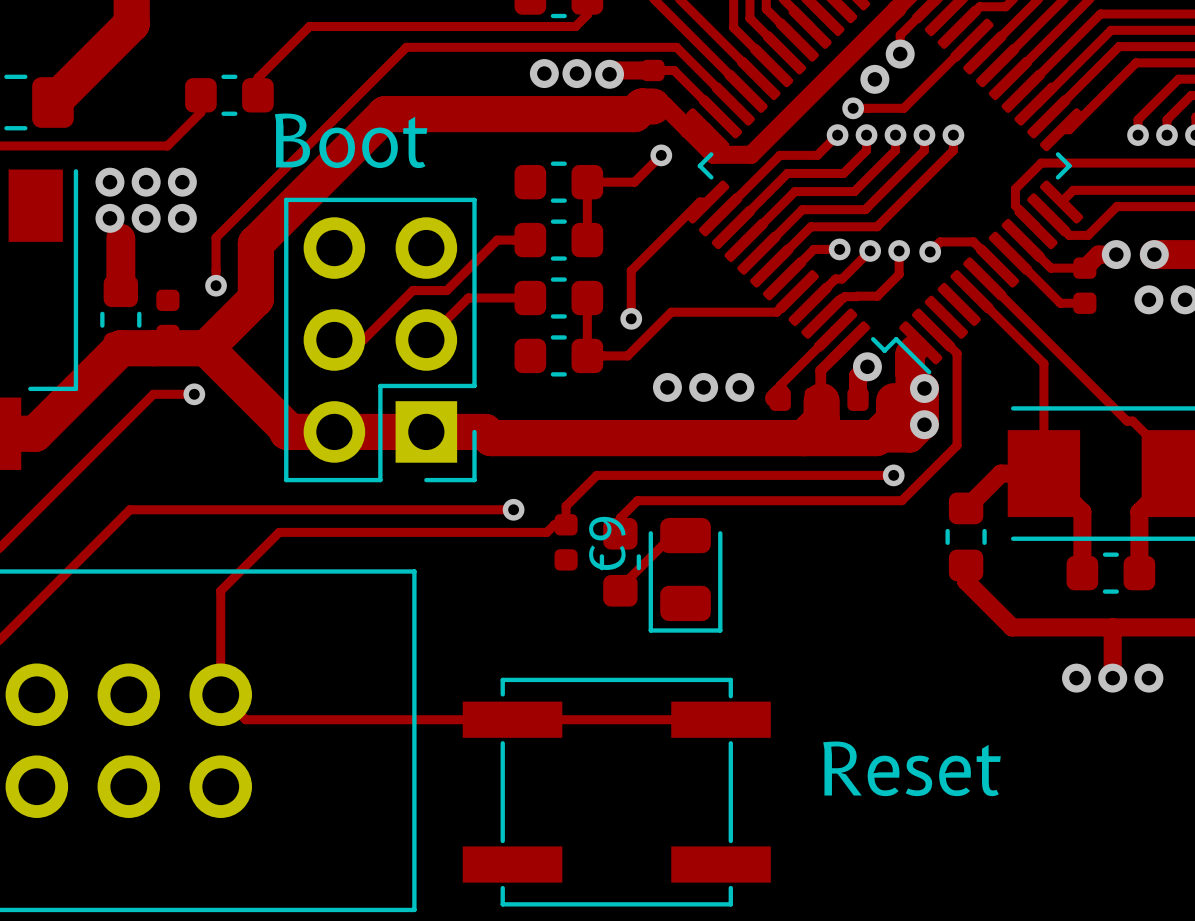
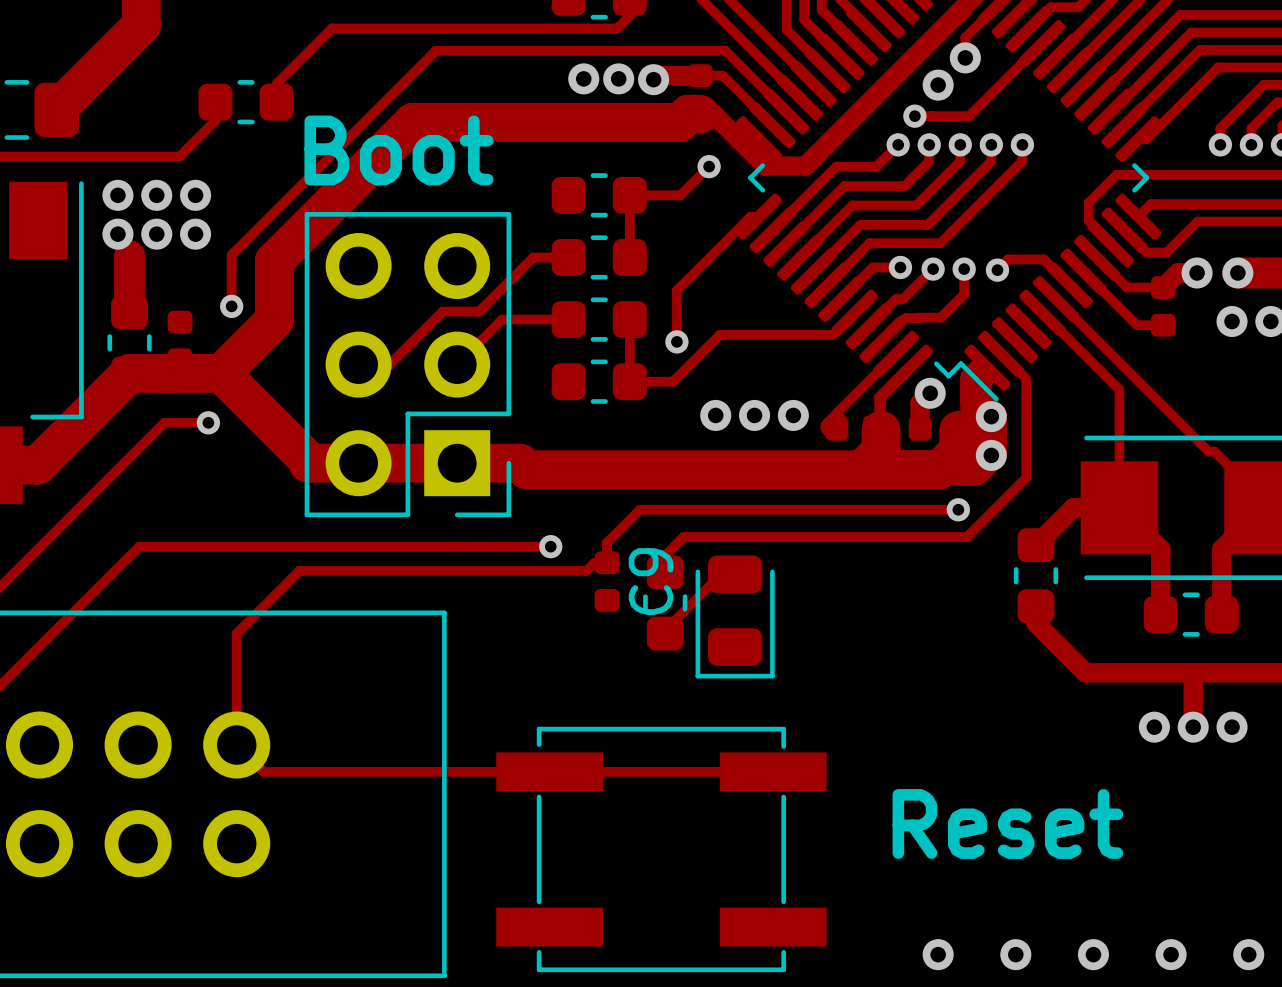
via: none -> (938, 954)
via: none -> (1015, 954)
via: none -> (1093, 954)
via: none -> (1171, 954)
via: none -> (1248, 954)

